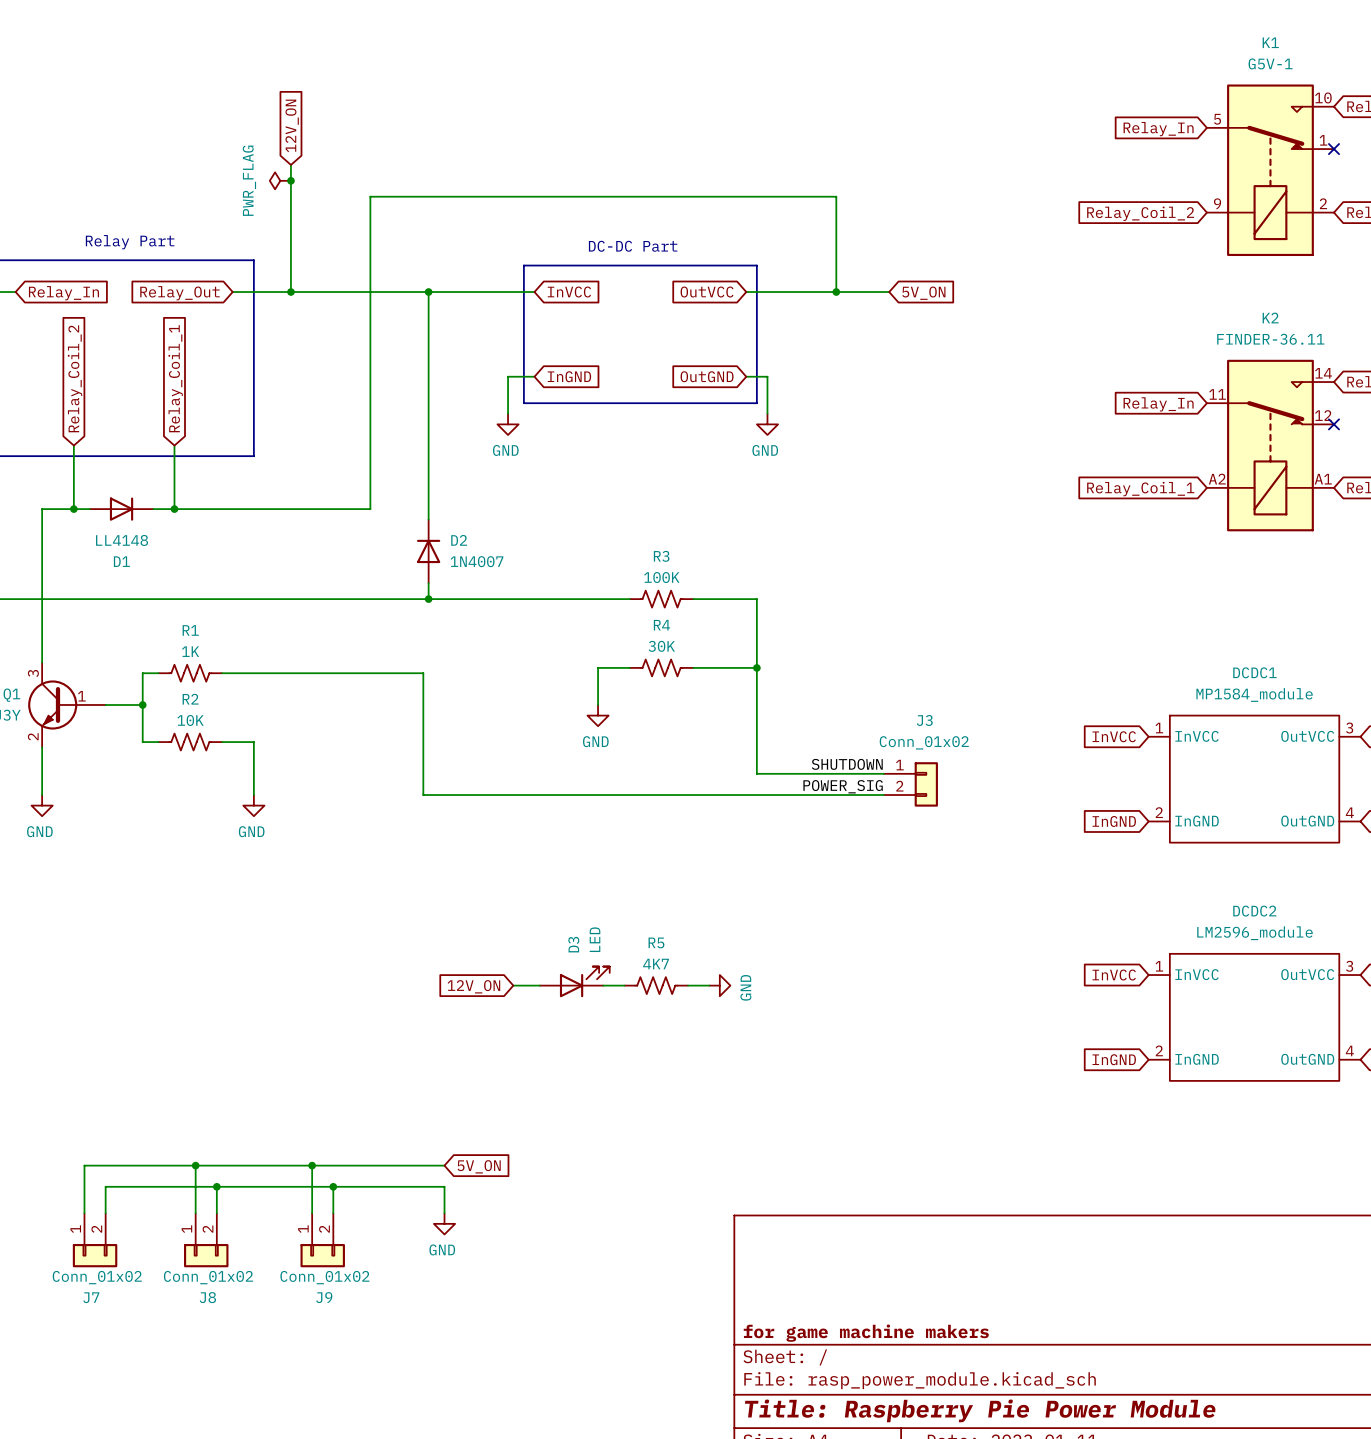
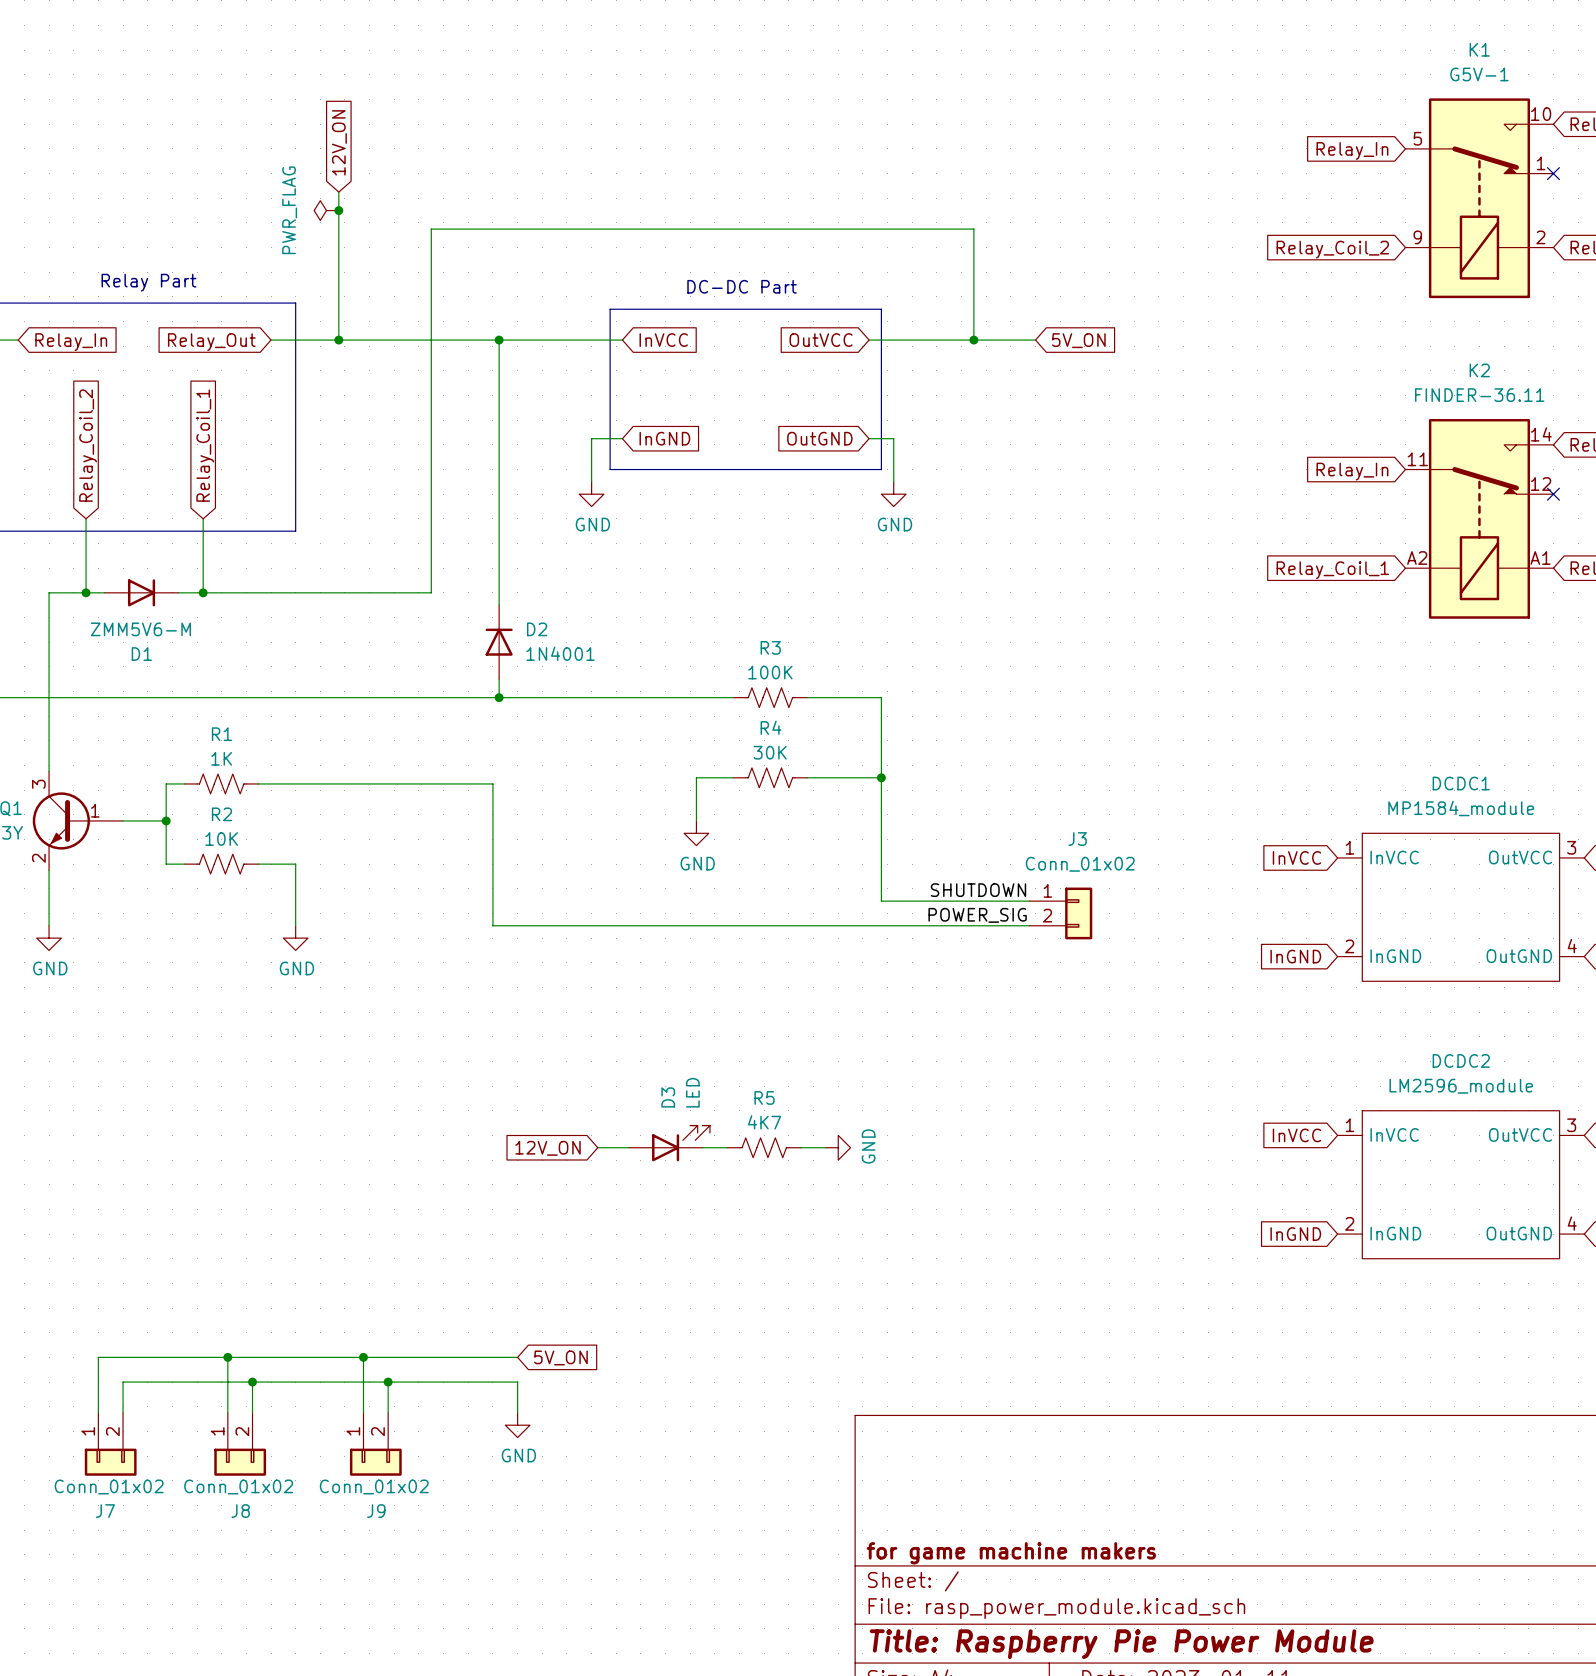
D1 value: LL4148 (122, 540) -> ZMM5V6-M (140, 629)
D2 value: 1N4007 (476, 561) -> 1N4001 (560, 653)

